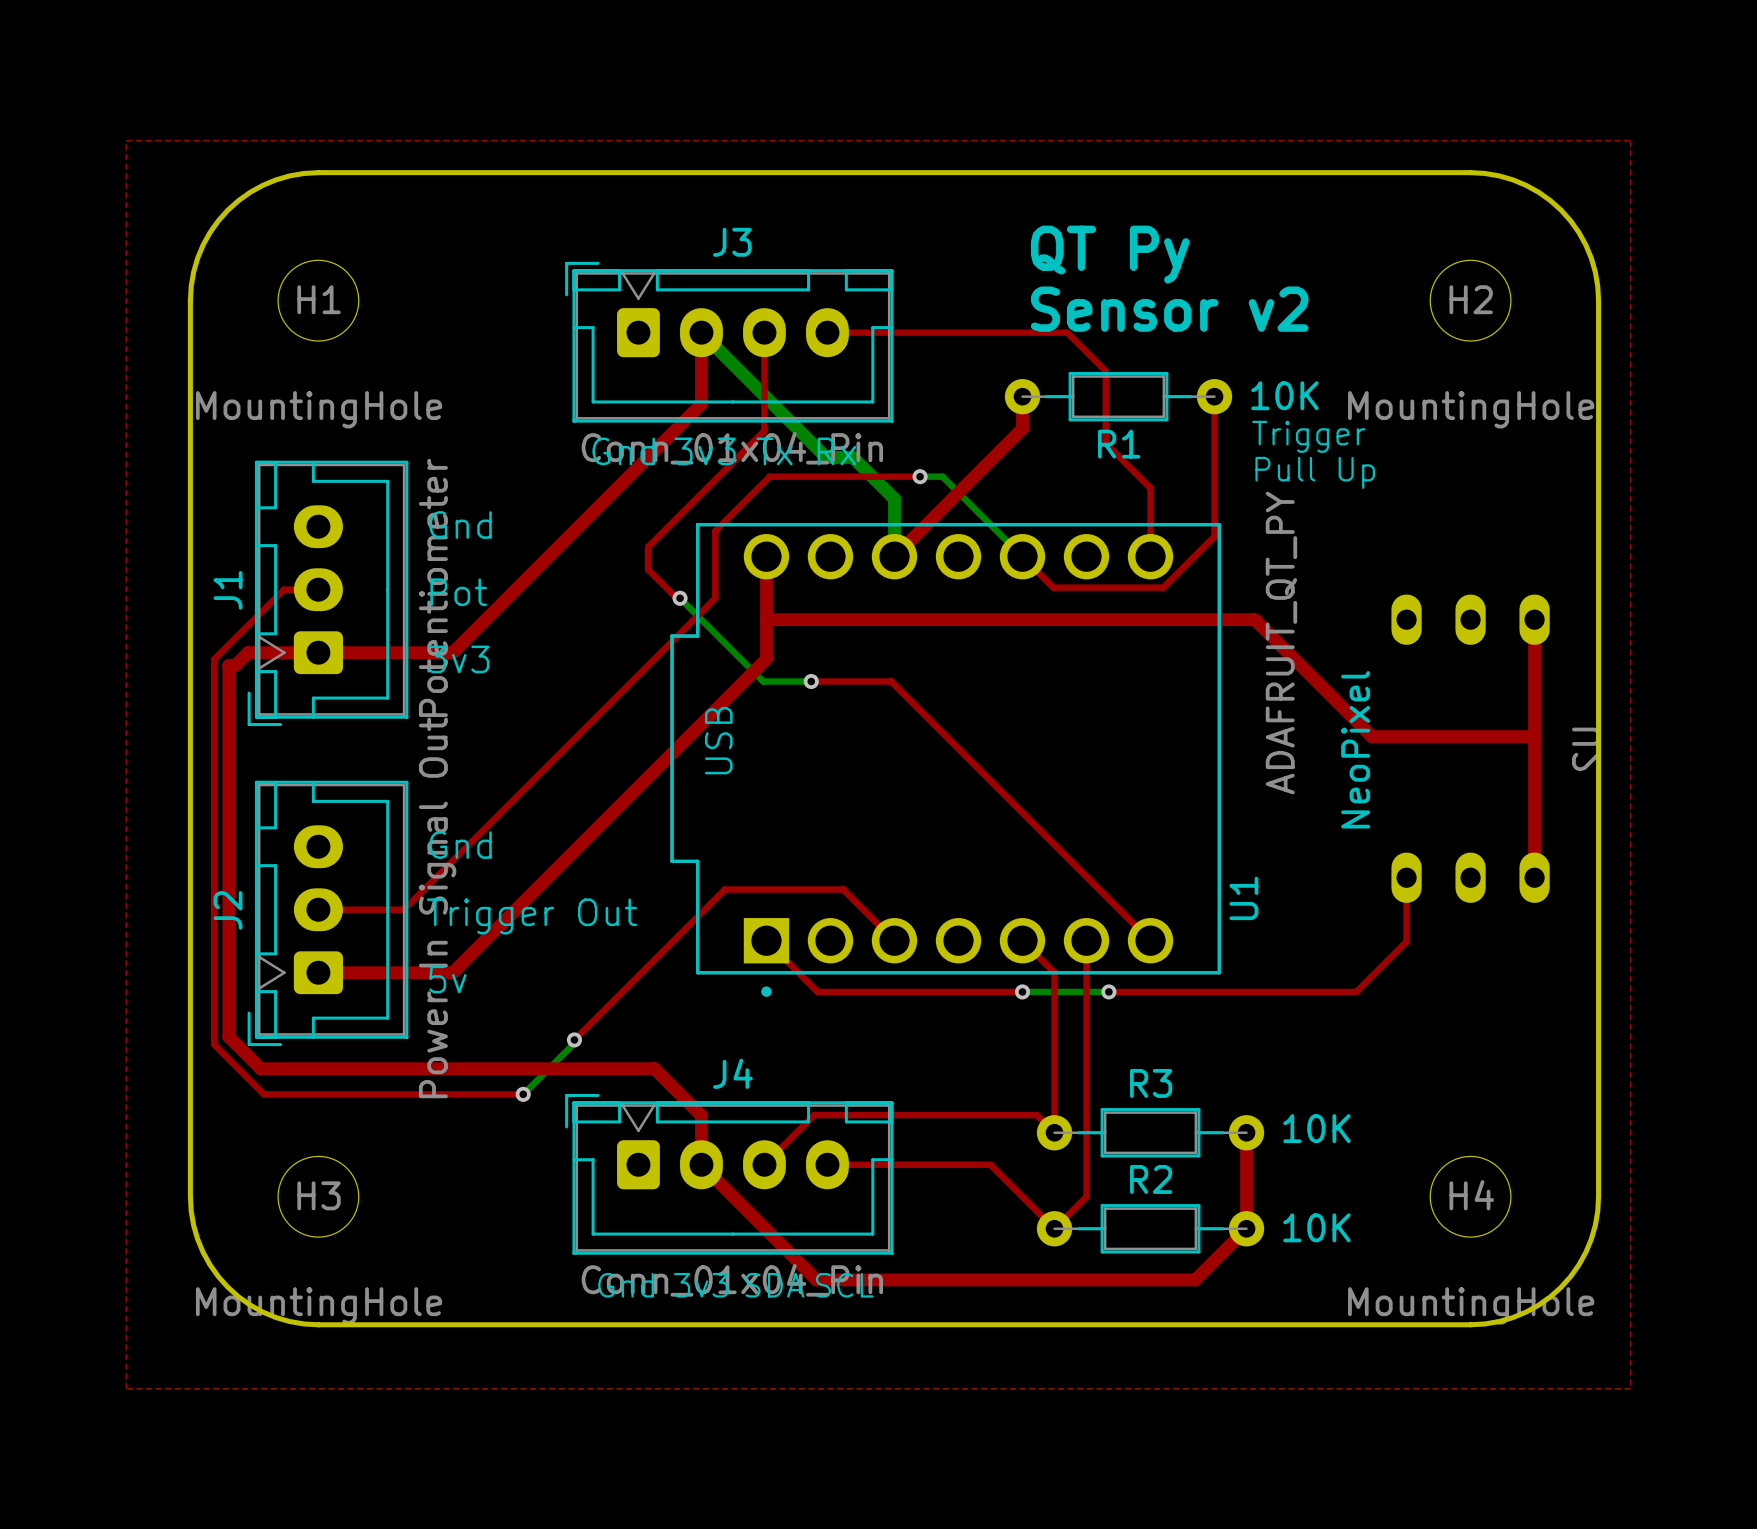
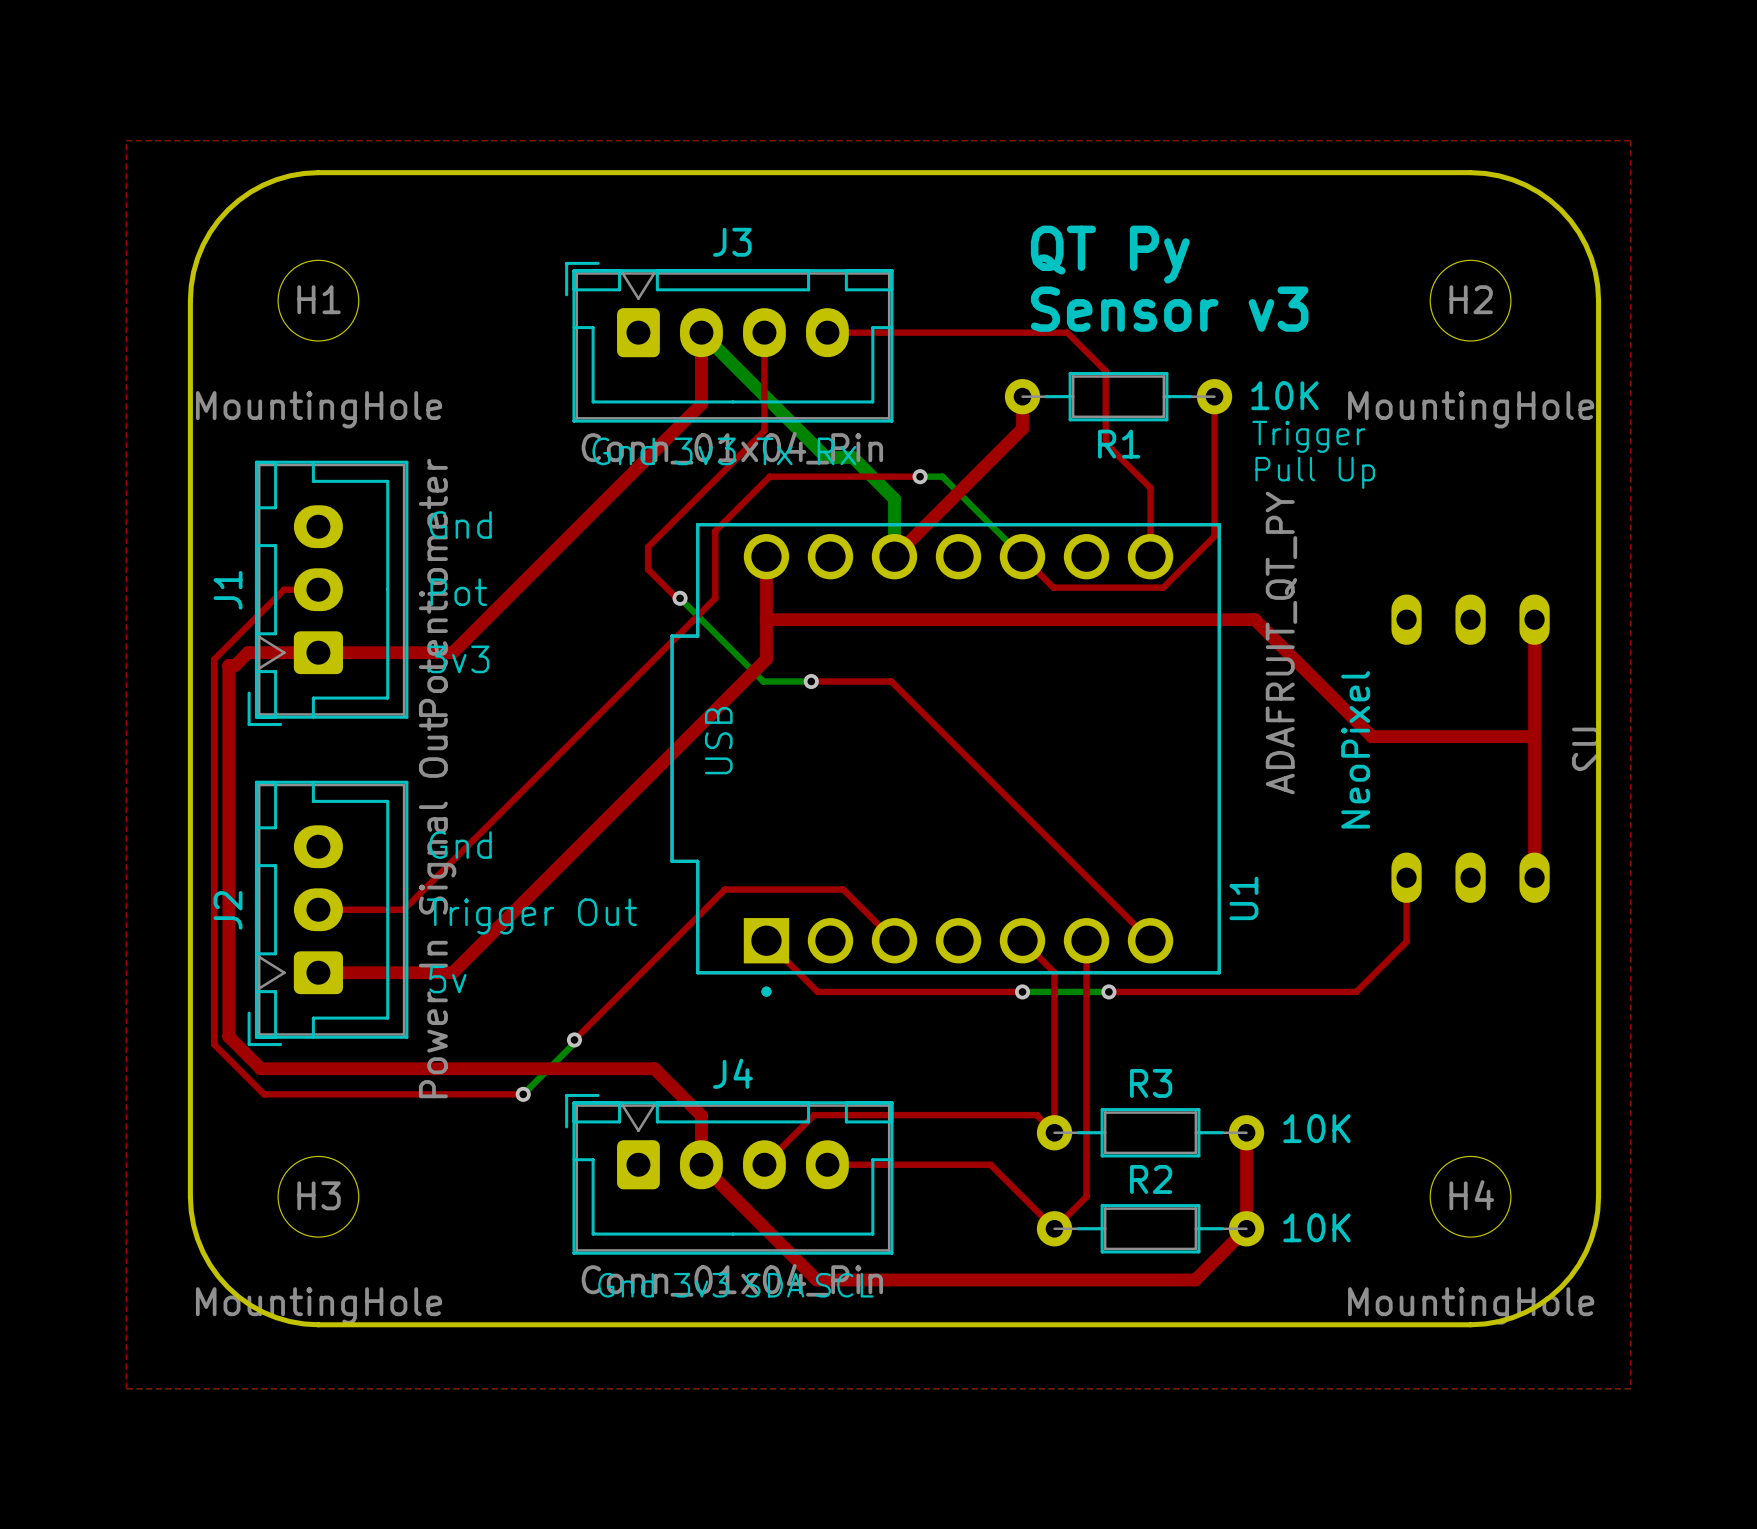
text: Sensor v2 (1169, 309) -> Sensor v3 (1169, 309)

